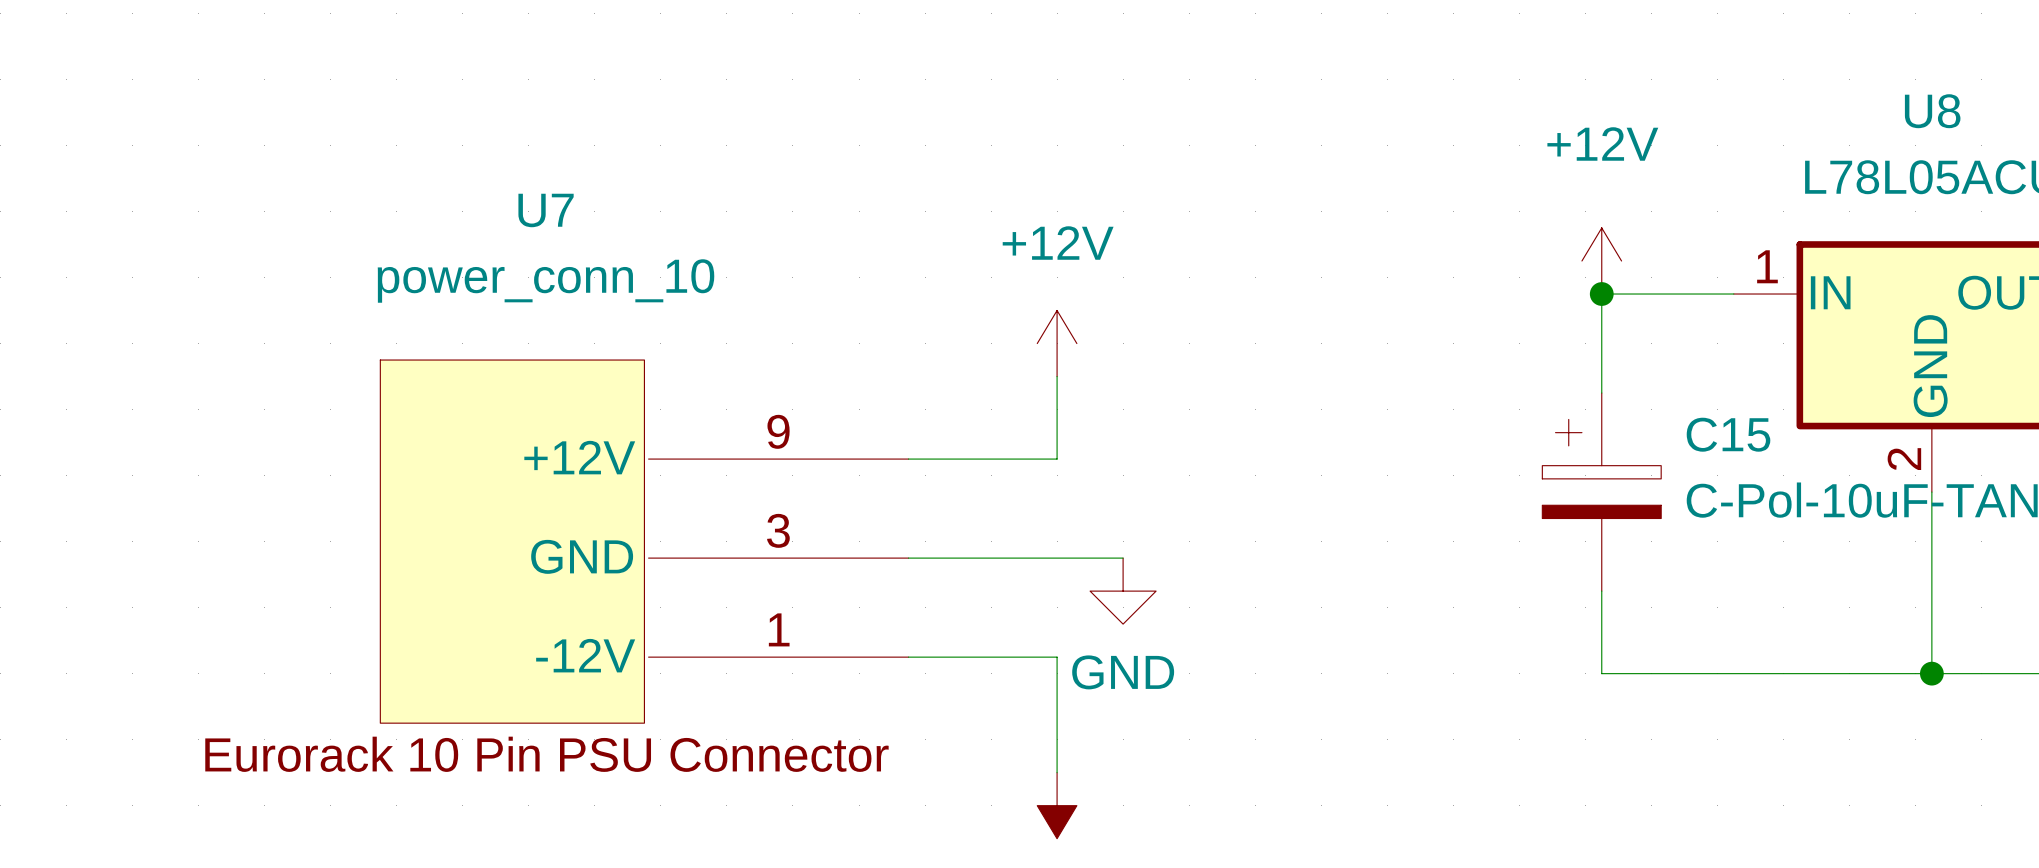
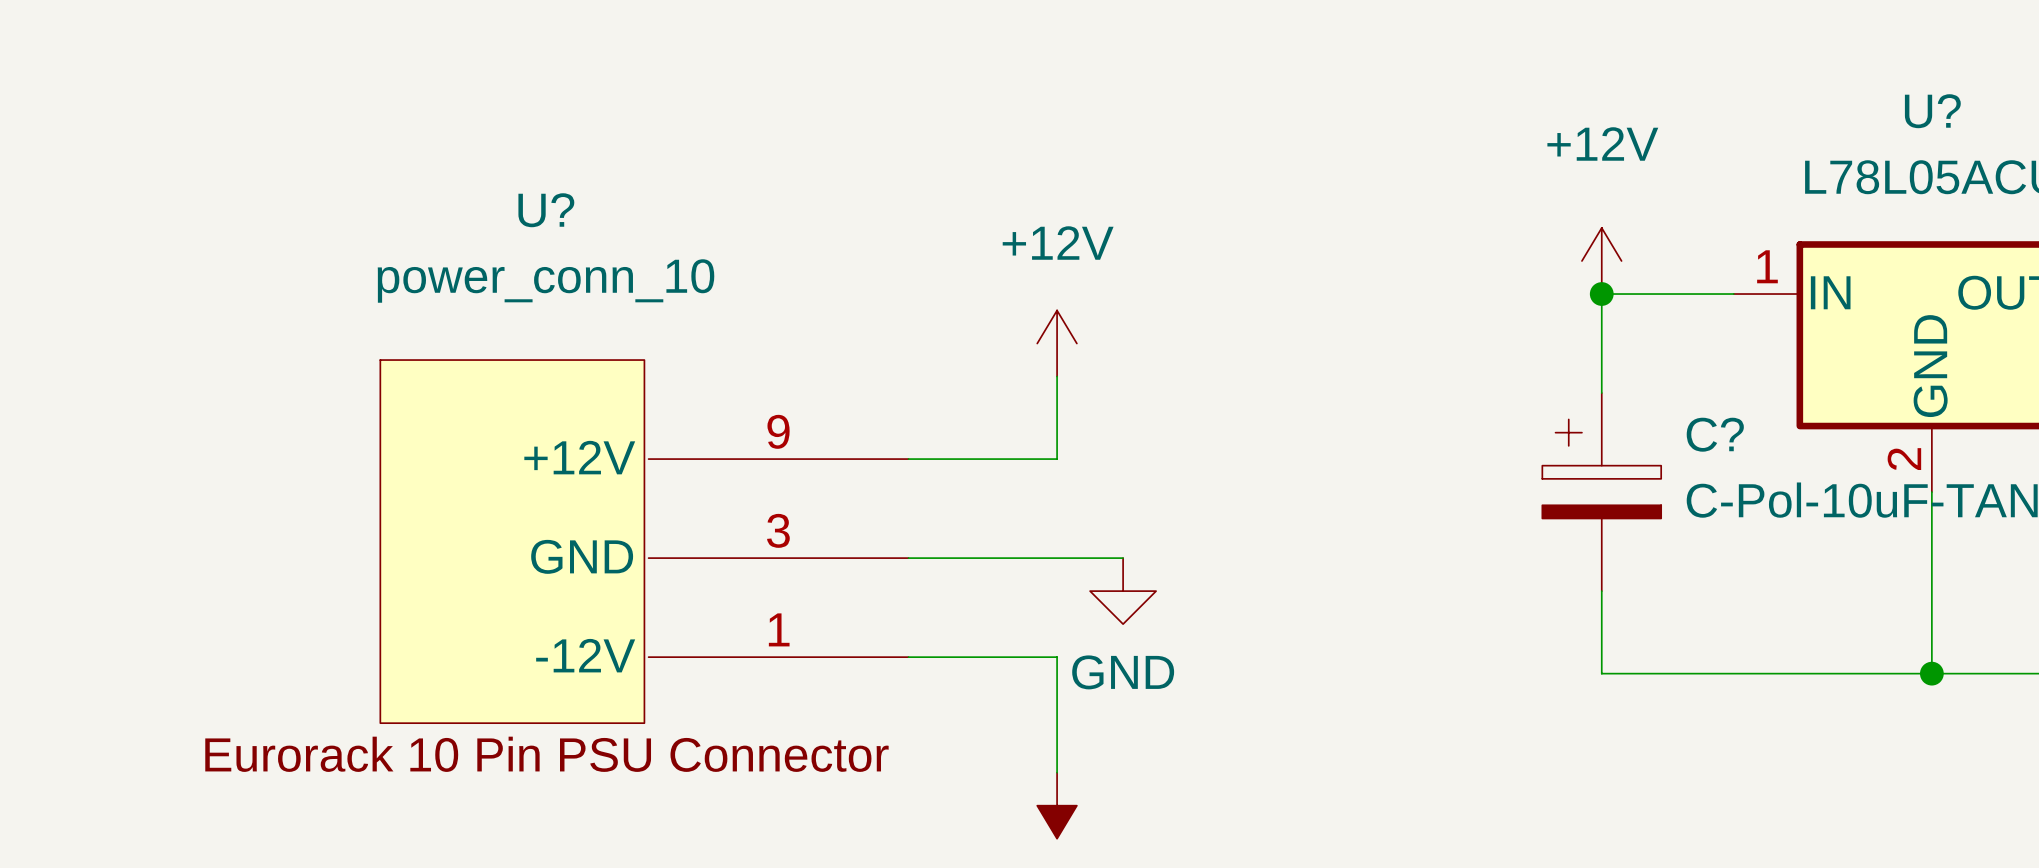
U8 name: U8 (1932, 111) -> U? (1932, 111)
U7 name: U7 (546, 210) -> U? (546, 210)
C15 name: C15 (1728, 434) -> C? (1715, 434)

